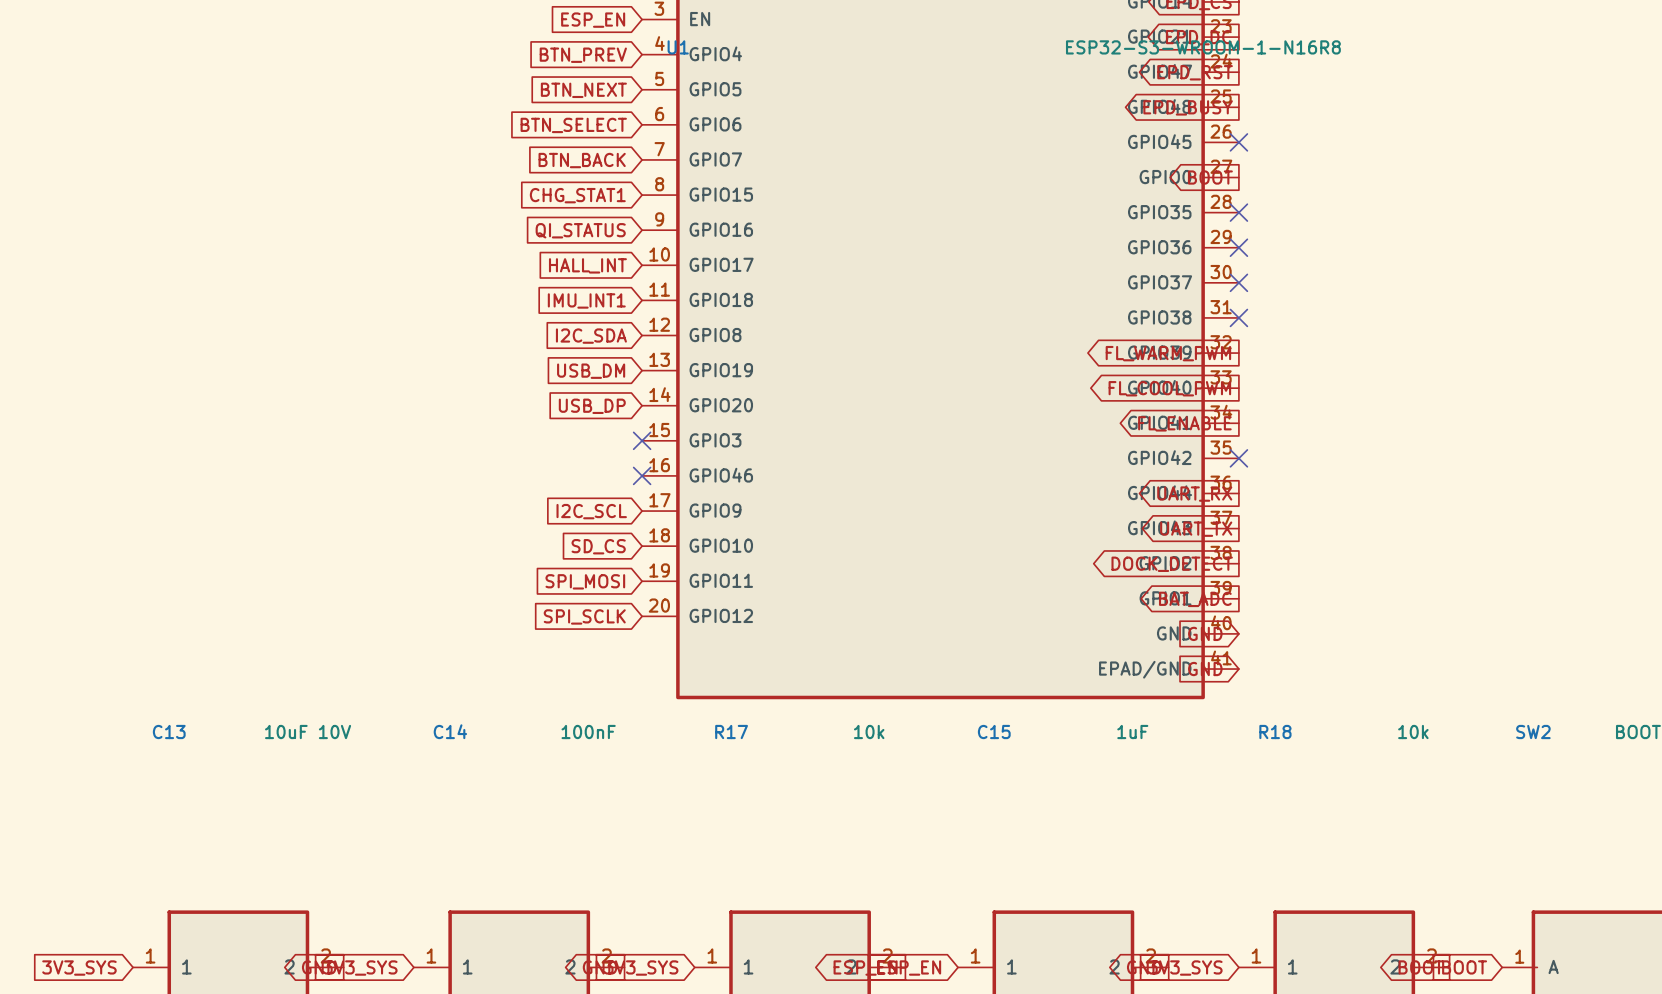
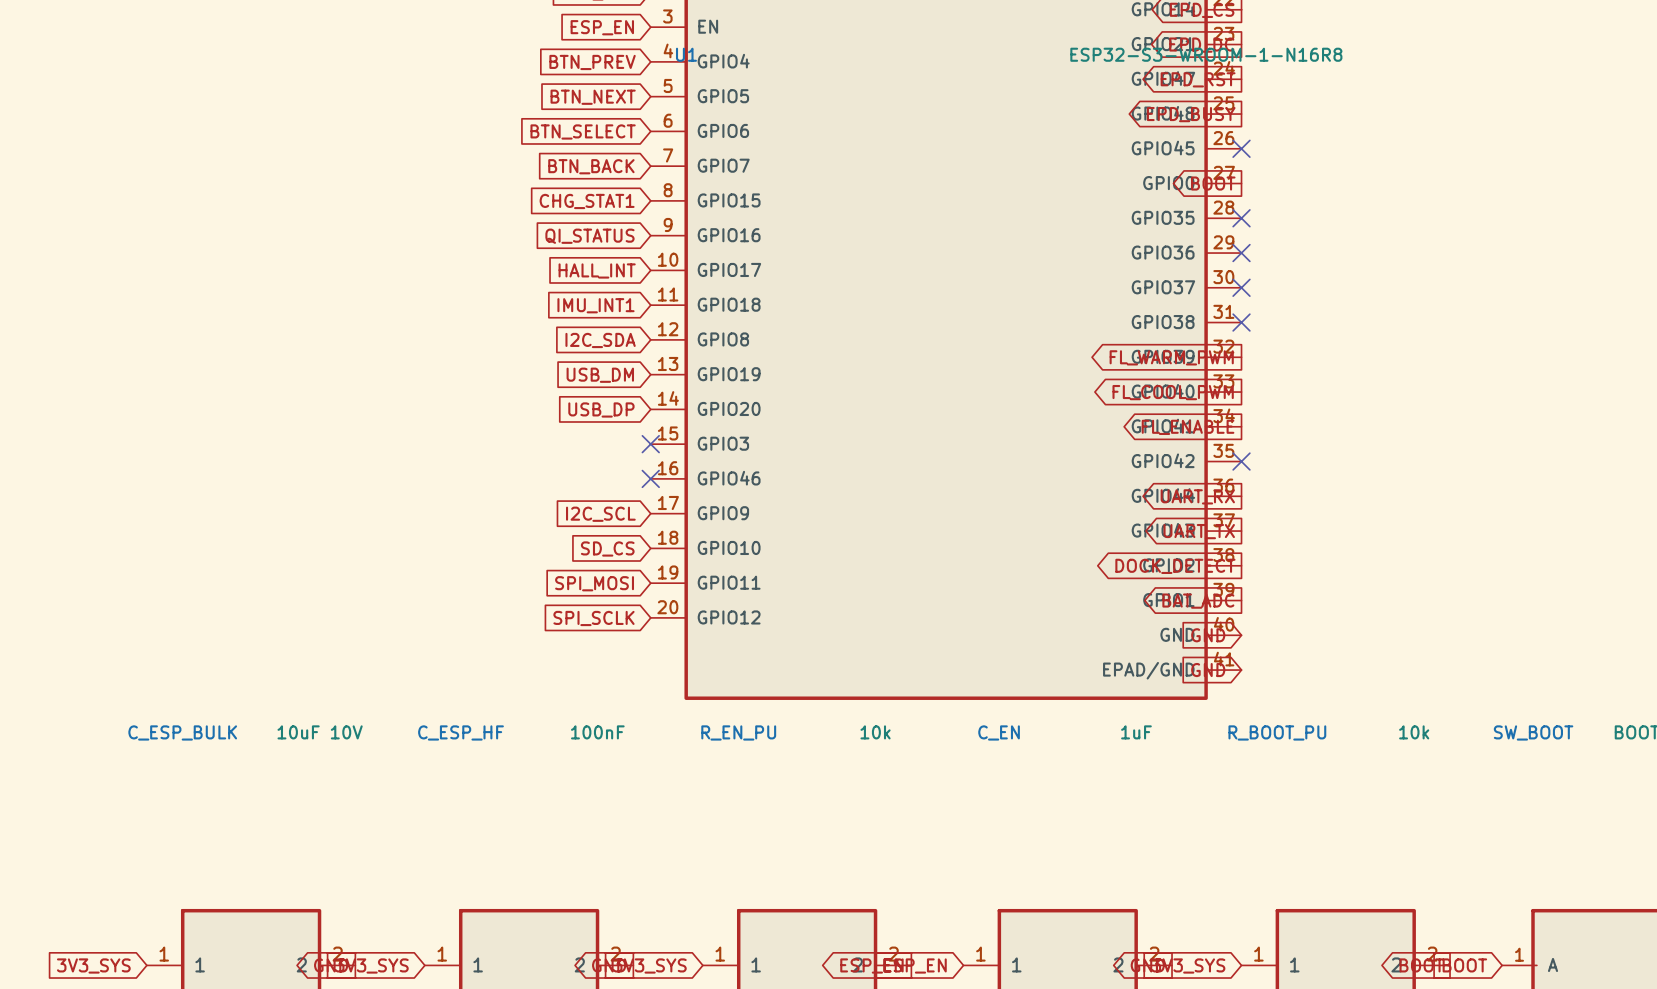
C14 name: C14 (450, 731) -> C_ESP_HF (461, 732)
C13 name: C13 (169, 732) -> C_ESP_BULK (182, 732)
R17 name: R17 (731, 732) -> R_EN_PU (738, 732)
C15 name: C15 (994, 732) -> C_EN (999, 732)
R18 name: R18 (1275, 732) -> R_BOOT_PU (1277, 732)
SW2 name: SW2 (1533, 732) -> SW_BOOT (1533, 732)

